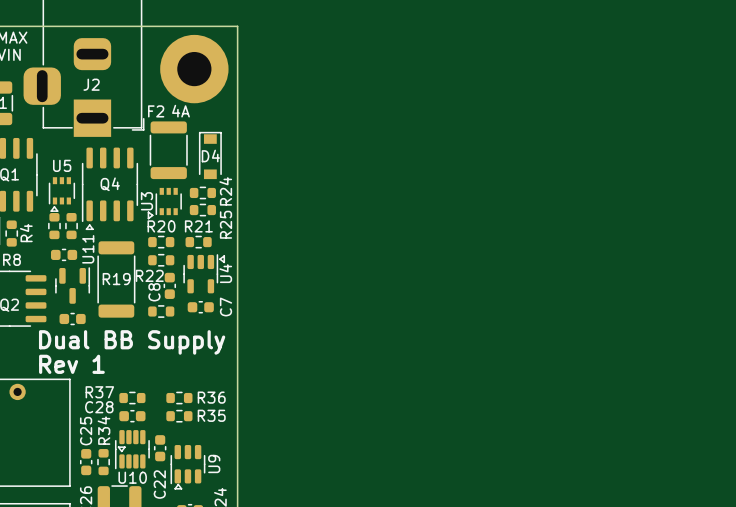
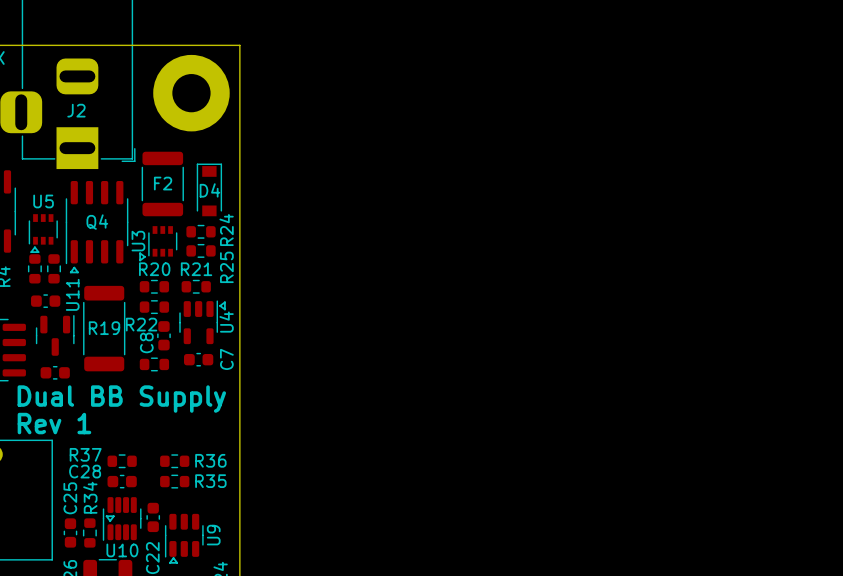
F2 name position: F2 (156, 111) -> F2 (163, 183)
text: 4A (180, 111) -> none

